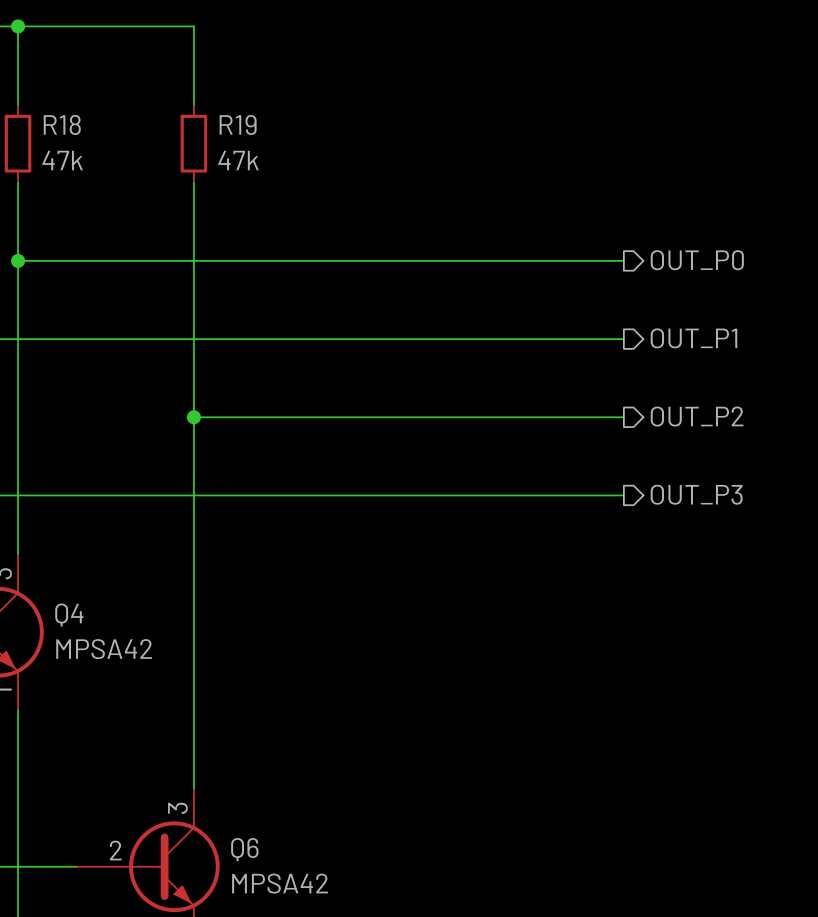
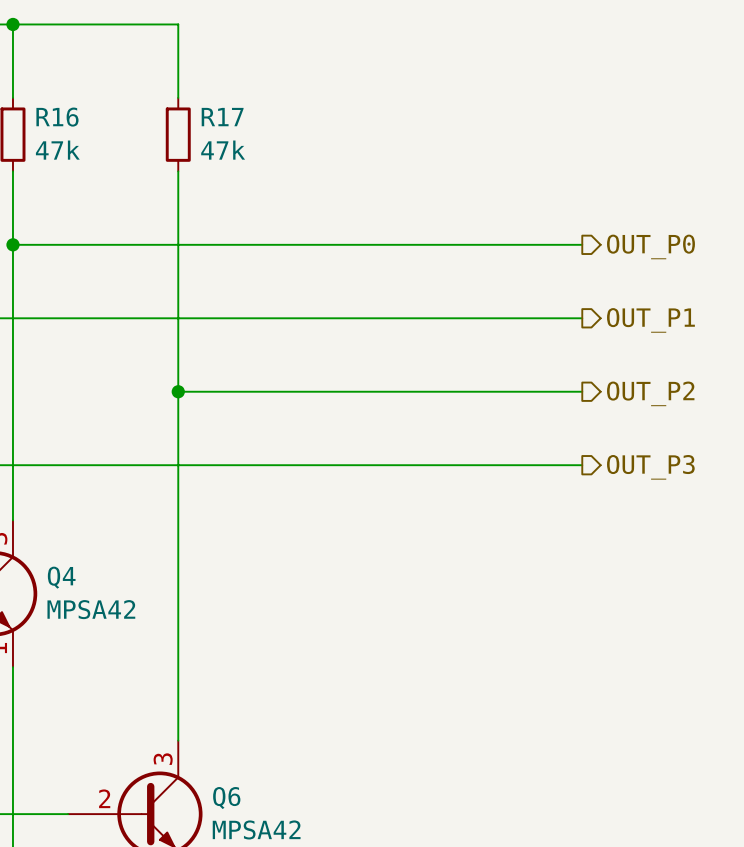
R18 name: R18 (62, 124) -> R16 (57, 117)
R19 name: R19 (238, 124) -> R17 (222, 117)

